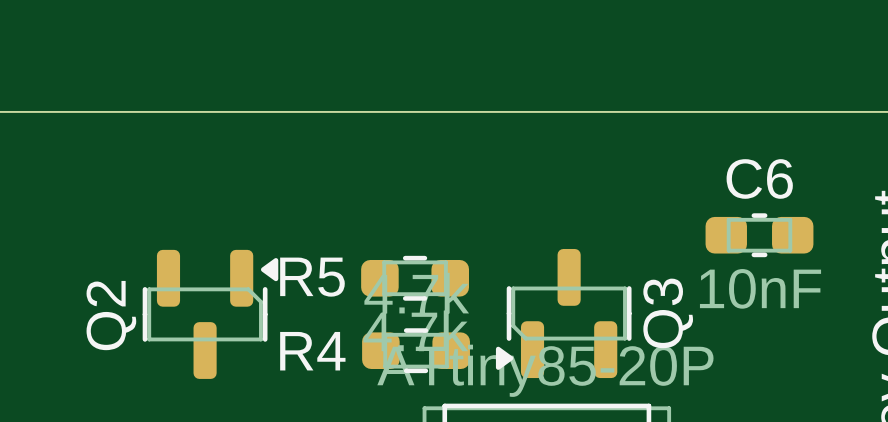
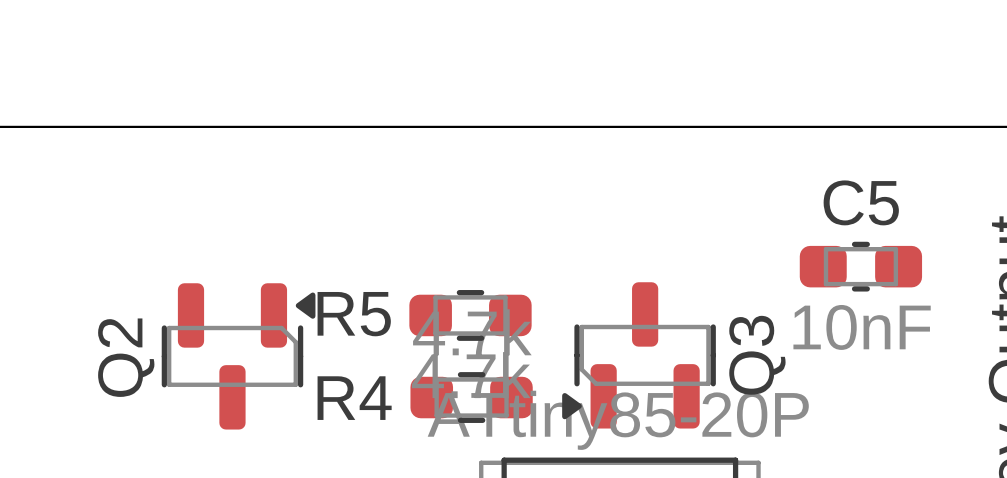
C6 name: C6 (759, 178) -> C5 (861, 202)

